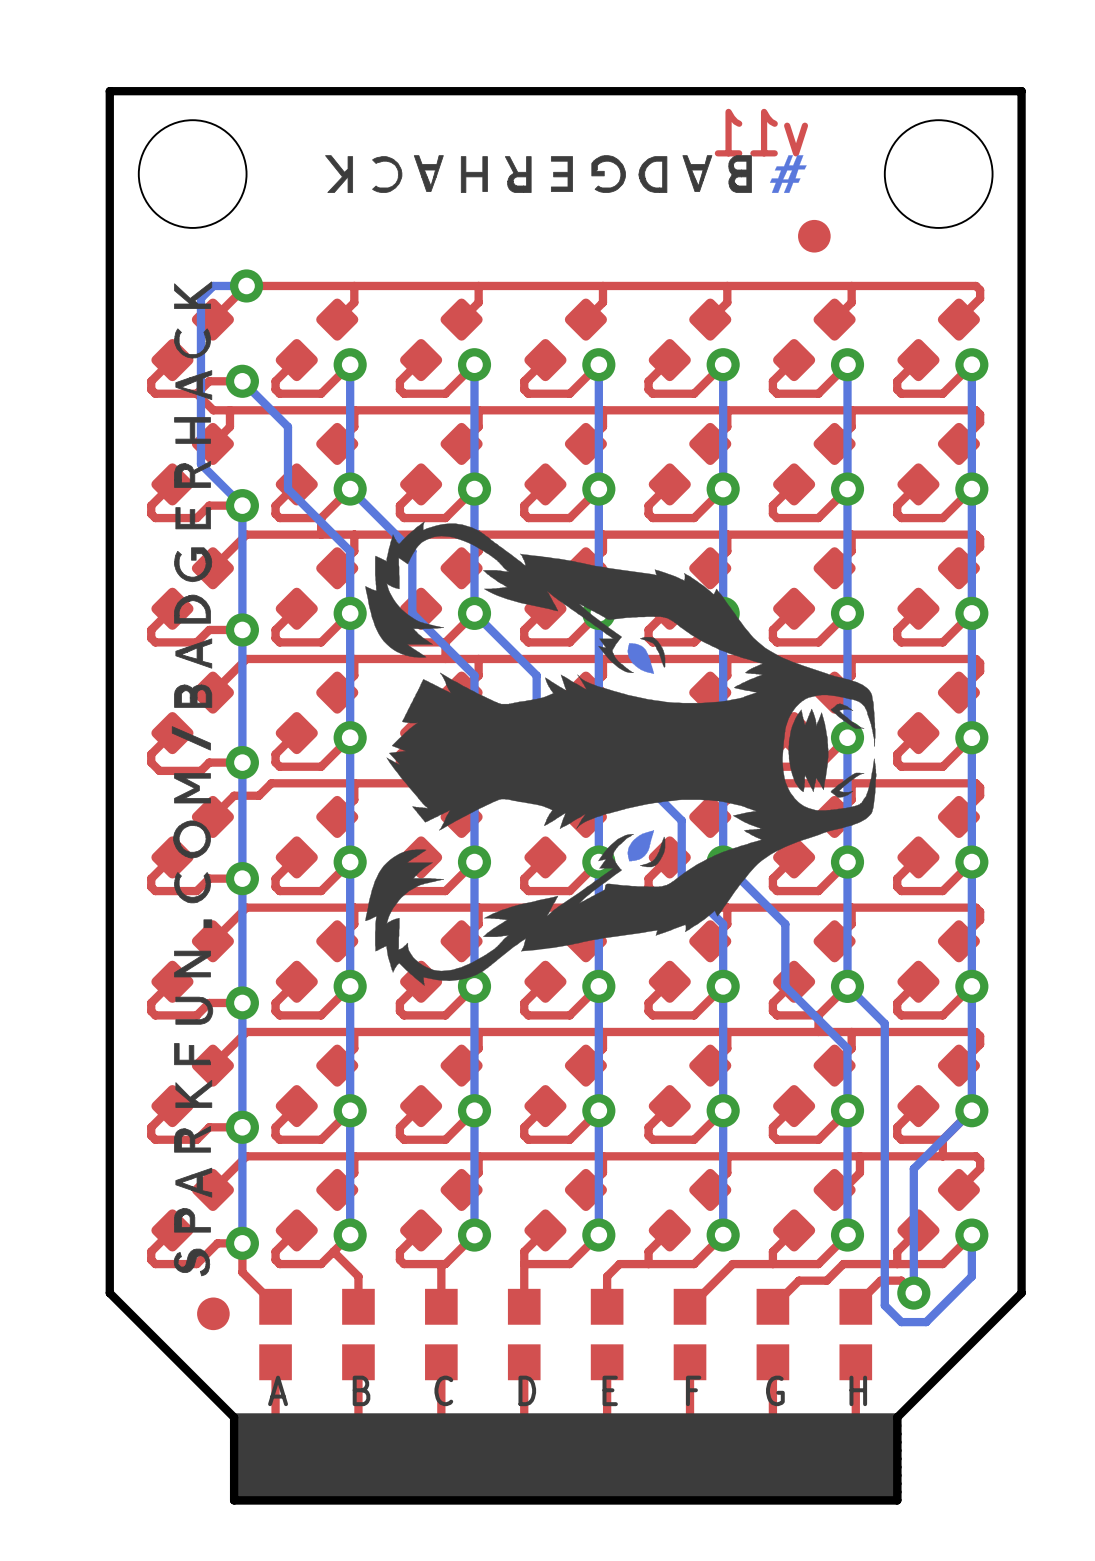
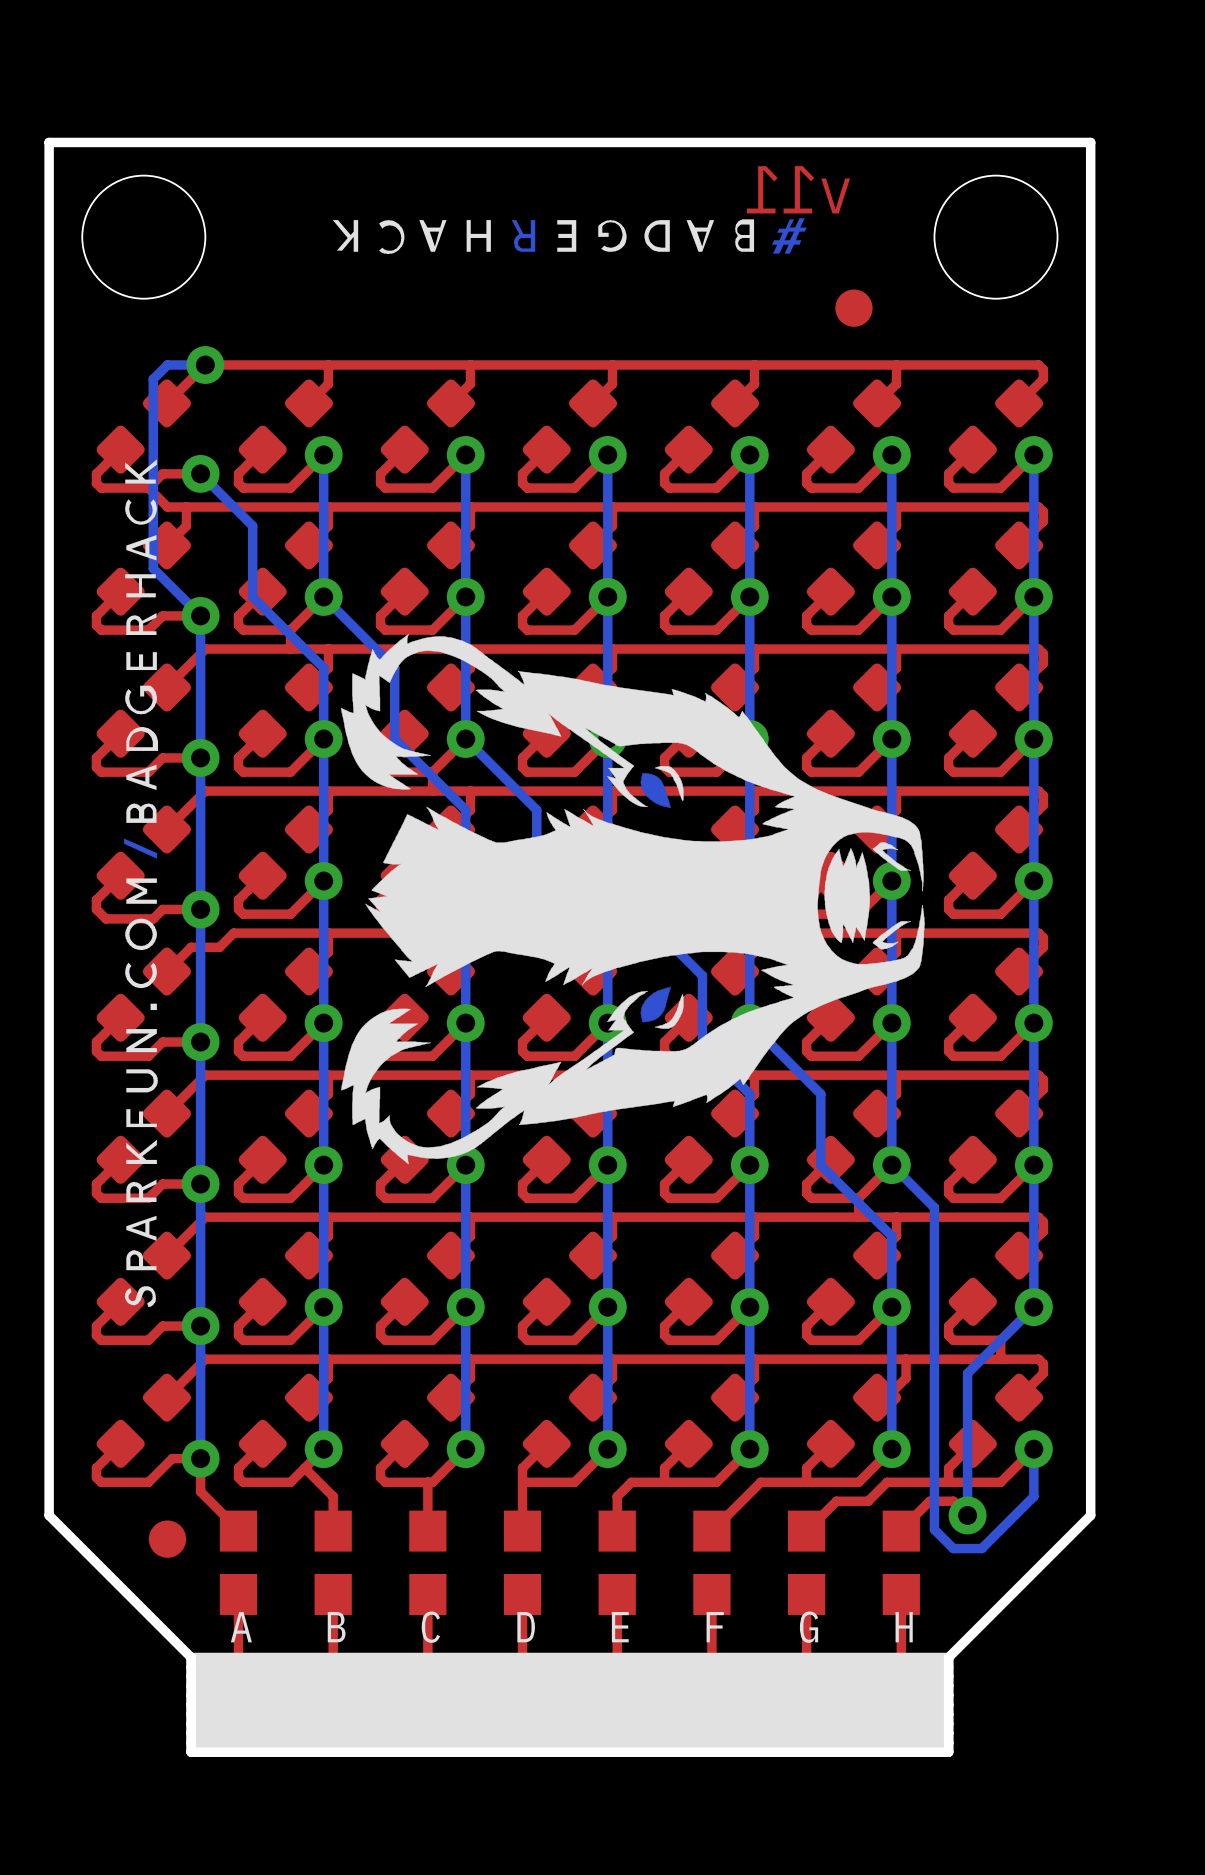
drawing shape: [325, 155, 807, 193] -> [332, 218, 807, 255]
drawing: [171, 281, 214, 1277] -> none
drawing: none -> [124, 459, 159, 1308]

